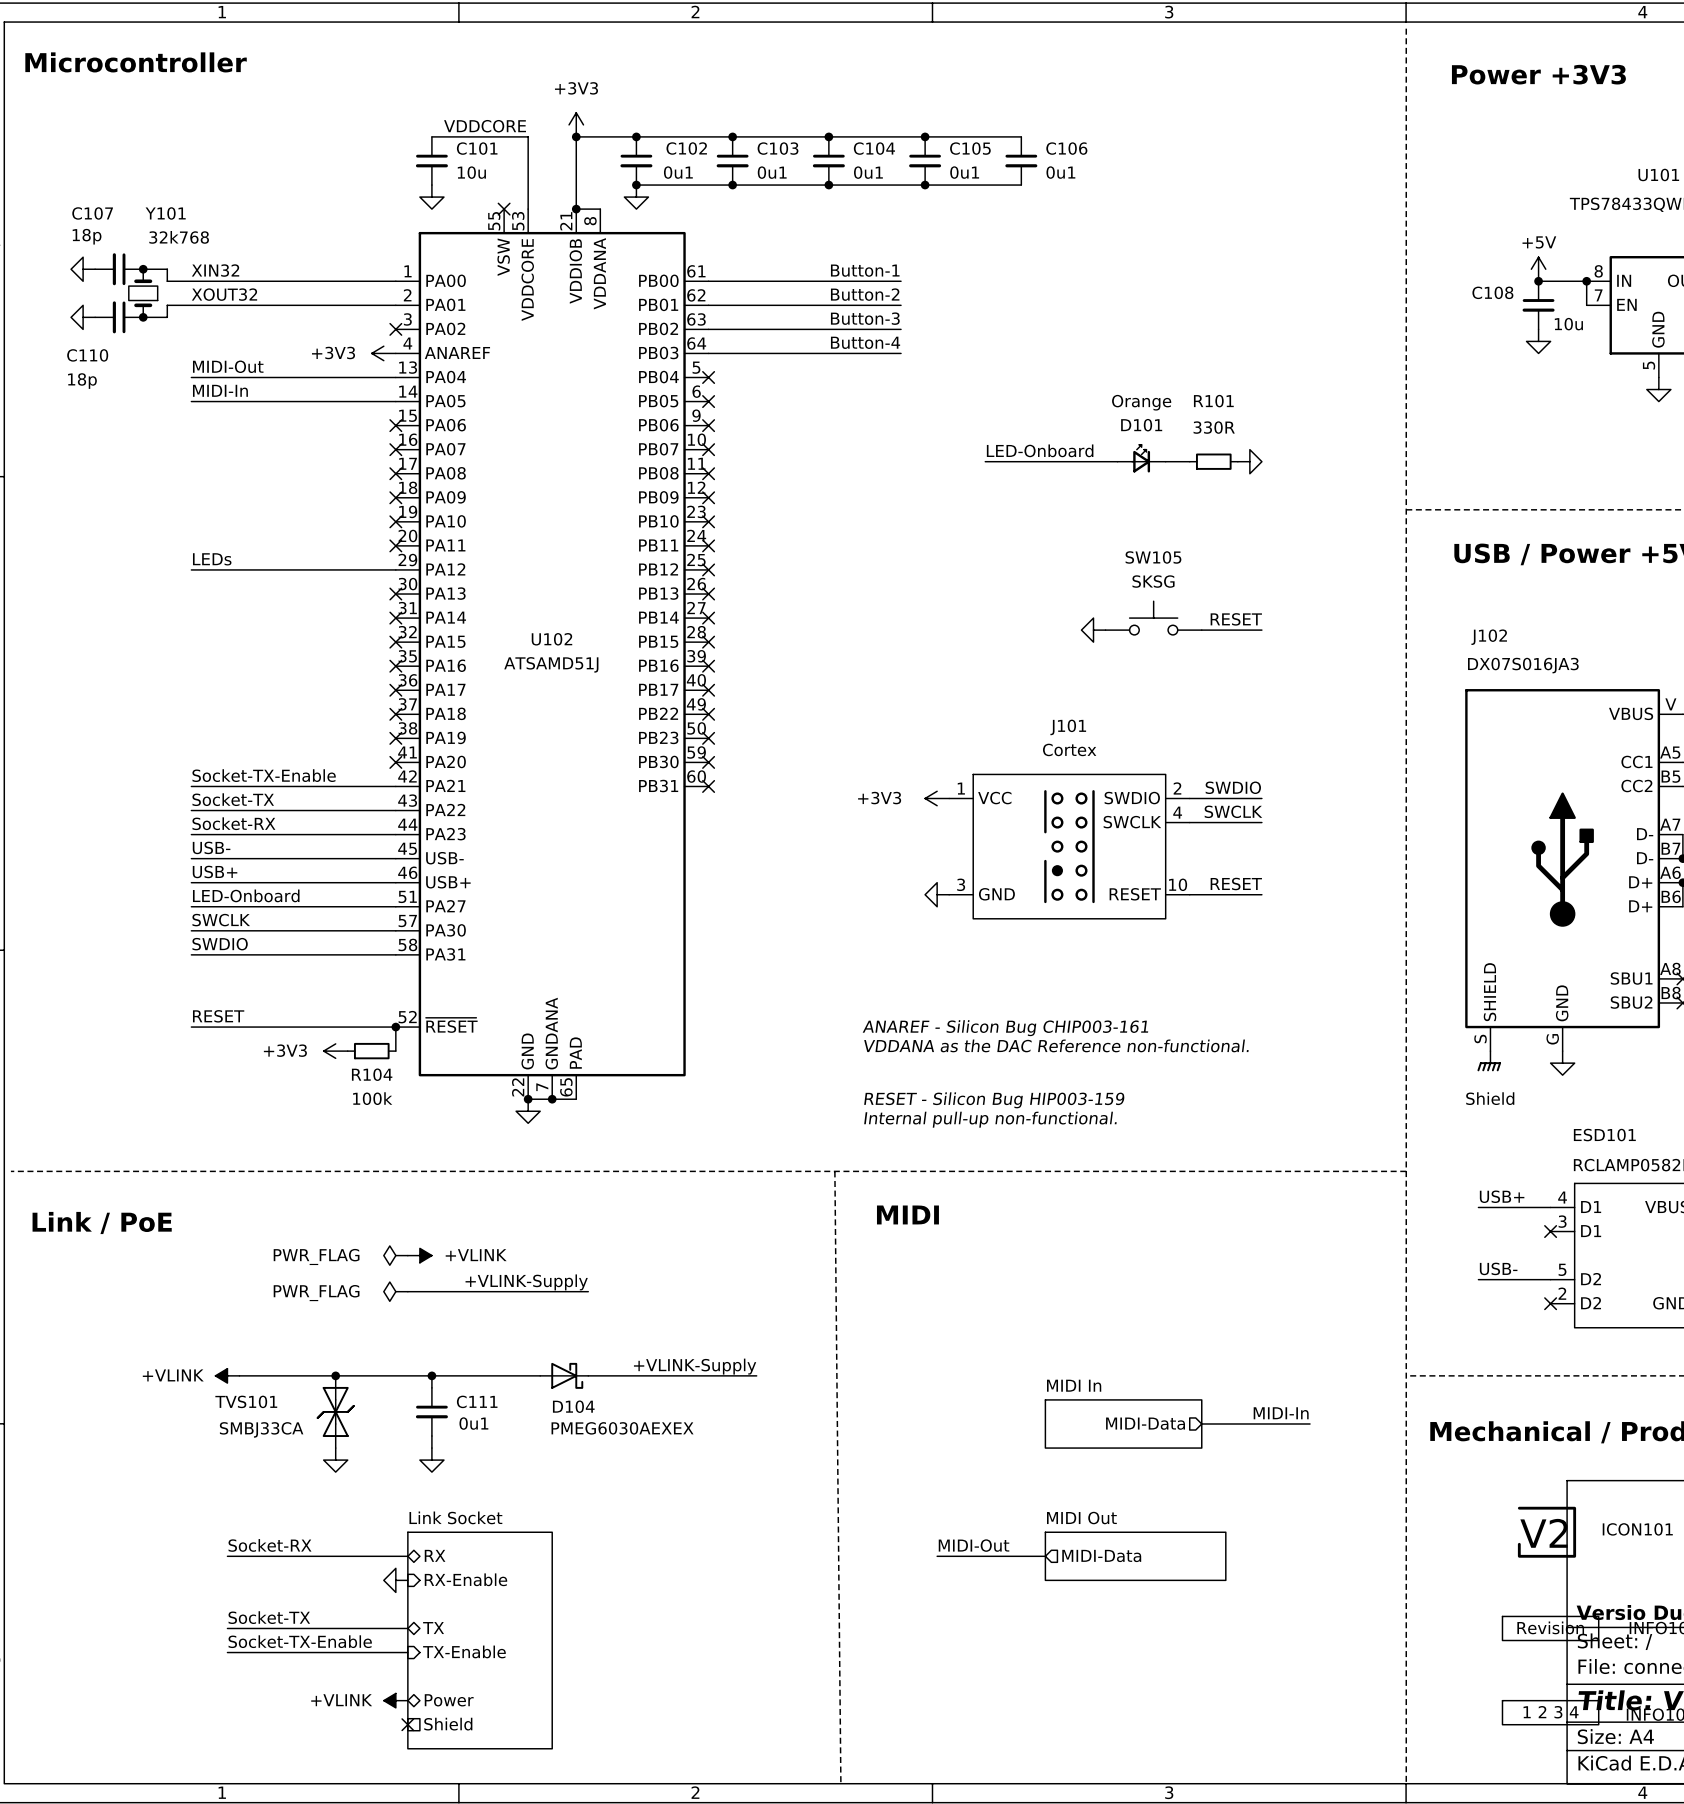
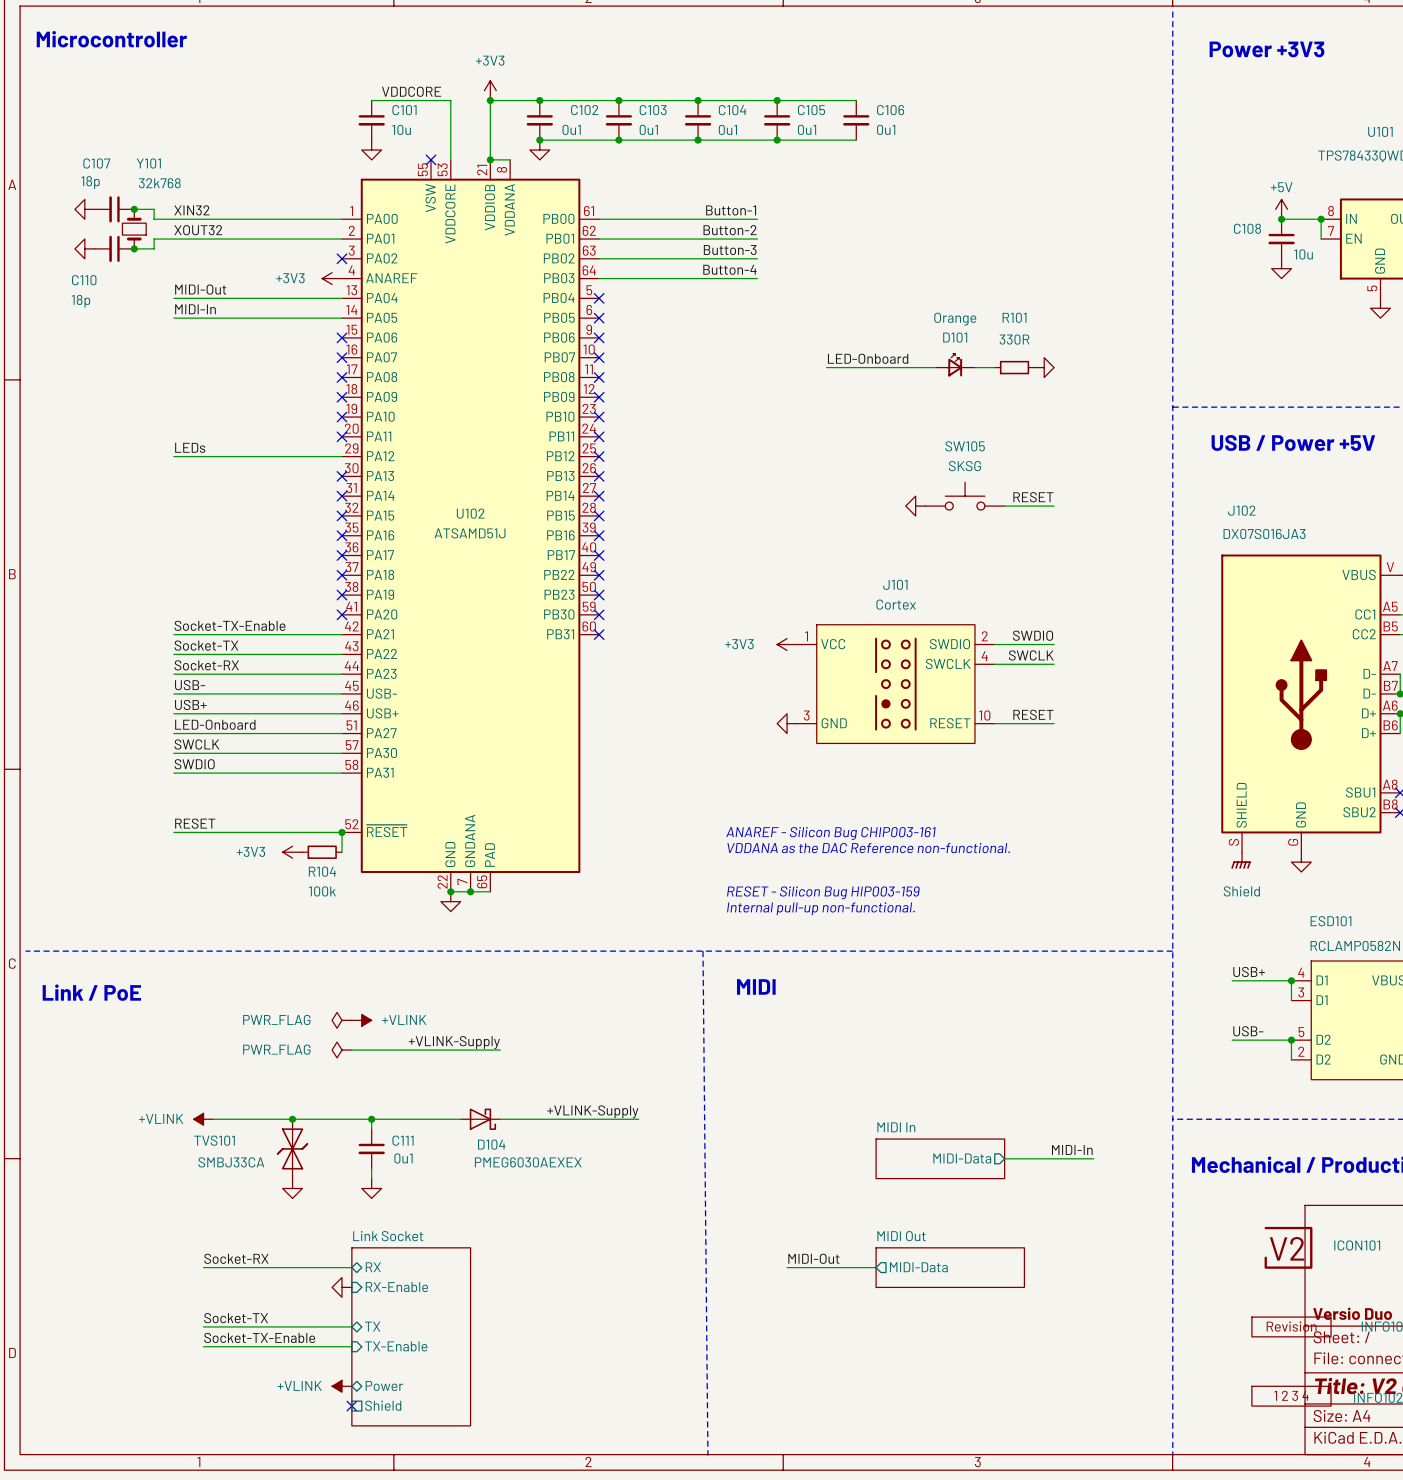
wire: none -> (1291, 980) (1291, 1000)
junction: none -> (1291, 980)
no-connect mark: (1550, 1231) -> none
wire: none -> (1291, 1040) (1291, 1059)
junction: none -> (1291, 1040)
no-connect mark: (1550, 1303) -> none

